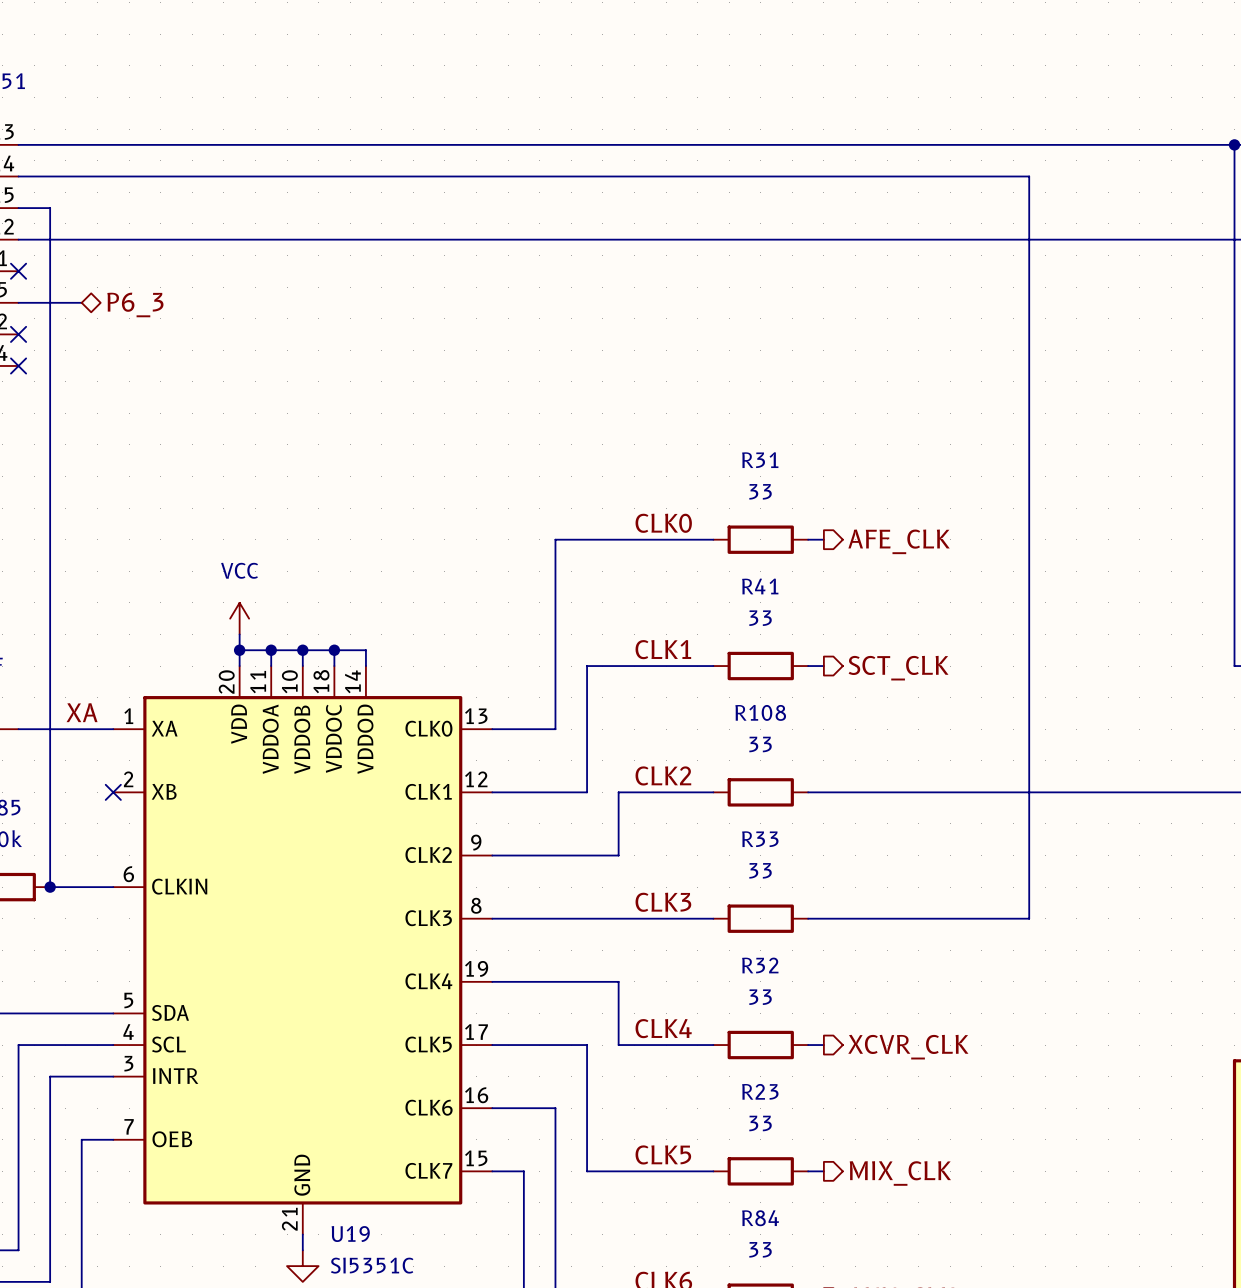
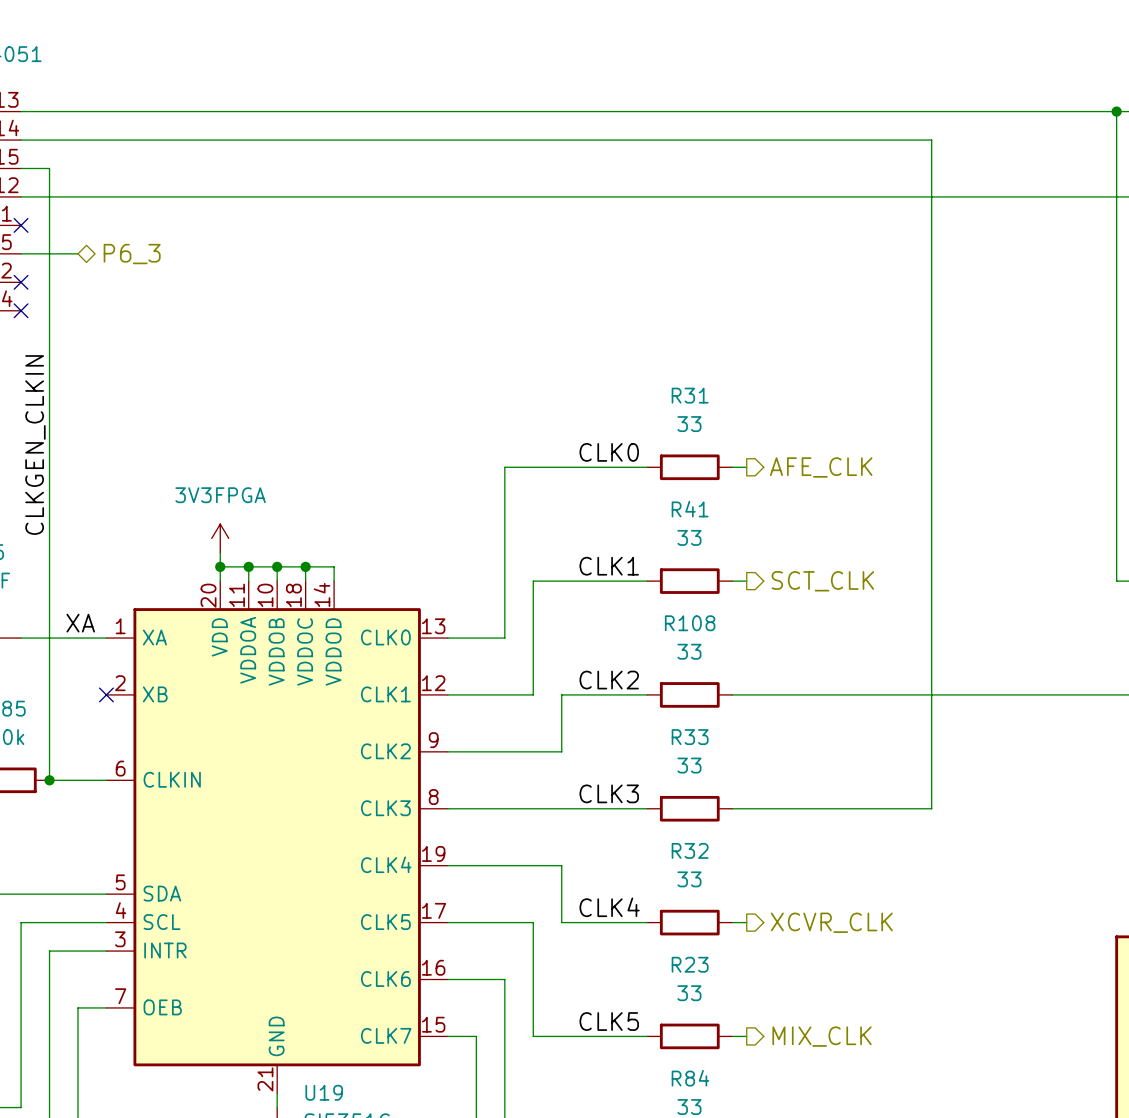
label: none -> CLKGEN_CLKIN (35, 445)
power symbol: VCC (239, 618) -> 3V3FPGA (220, 538)

